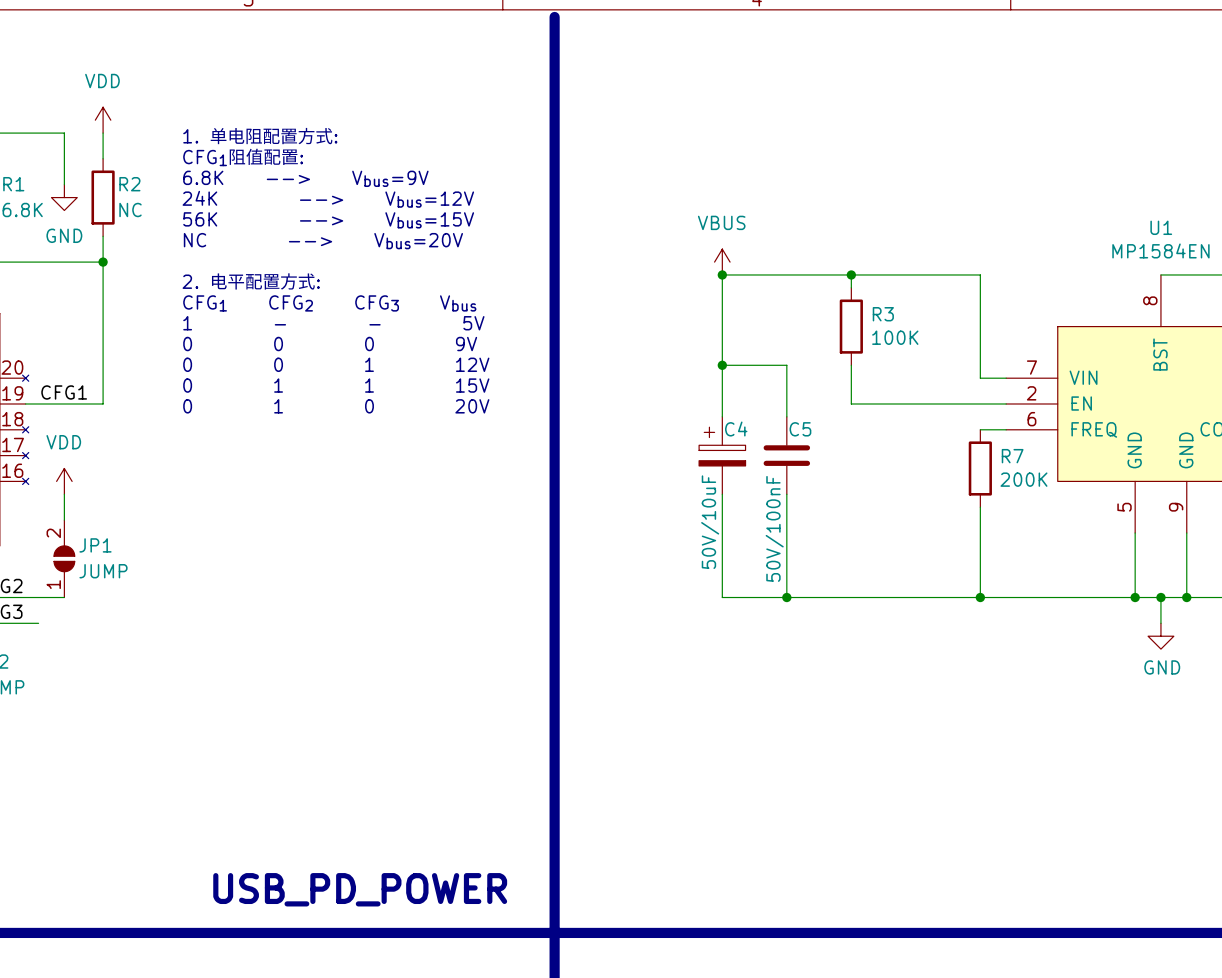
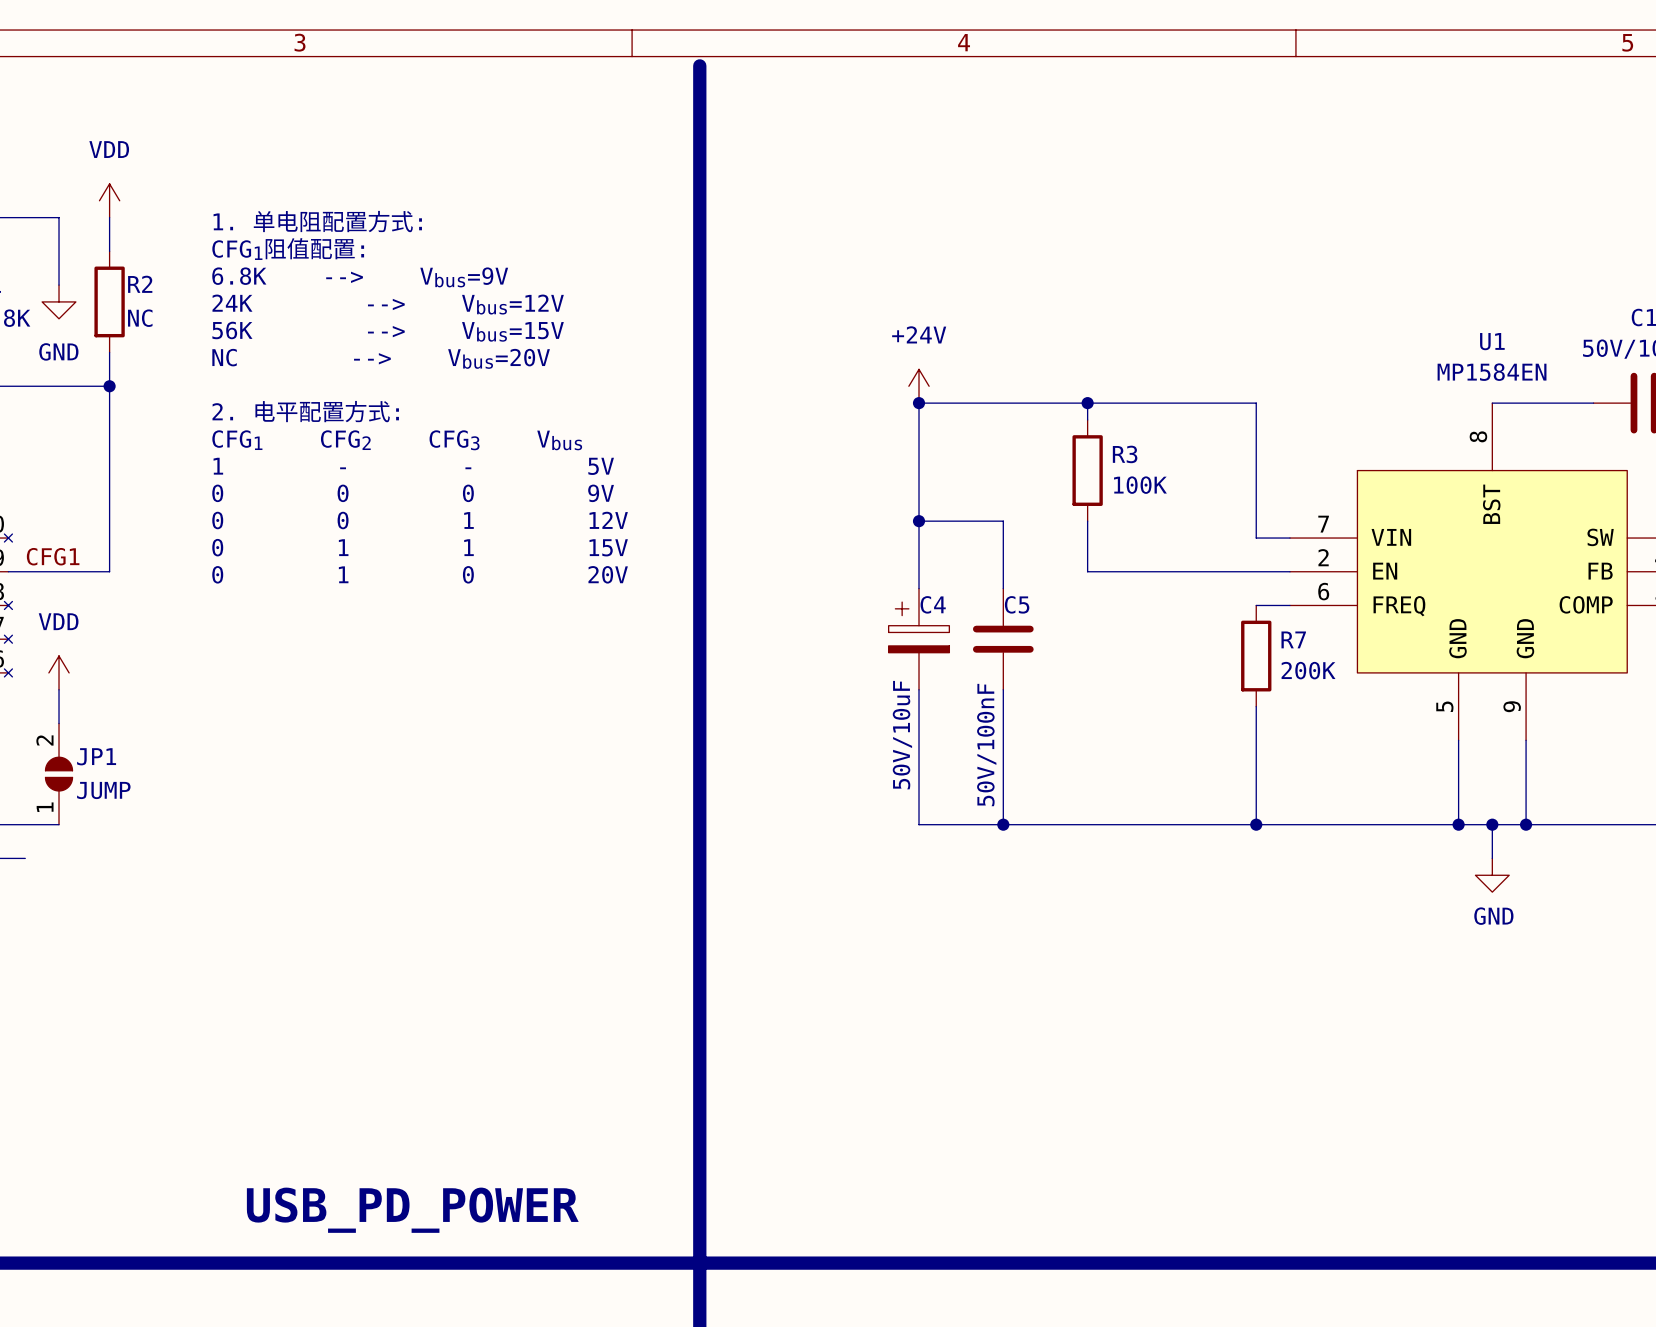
power symbol: VBUS (722, 262) -> +24V (919, 386)

